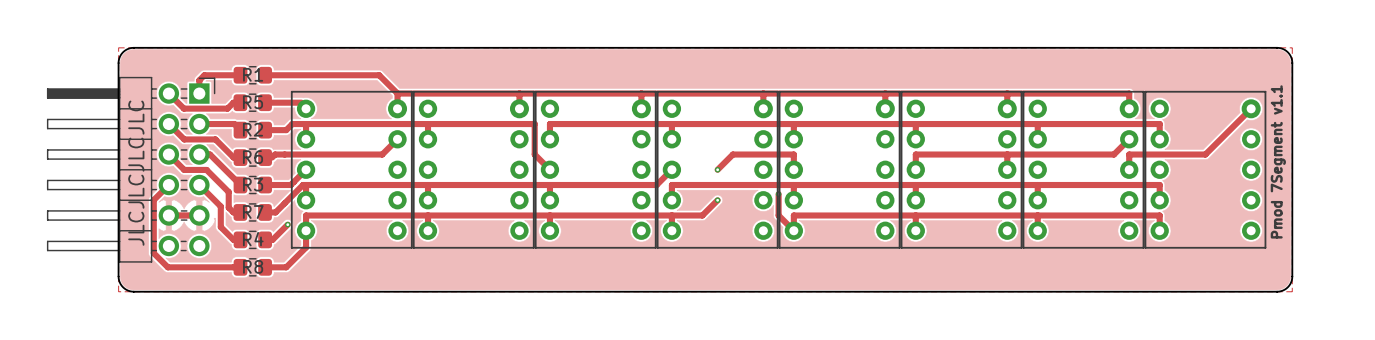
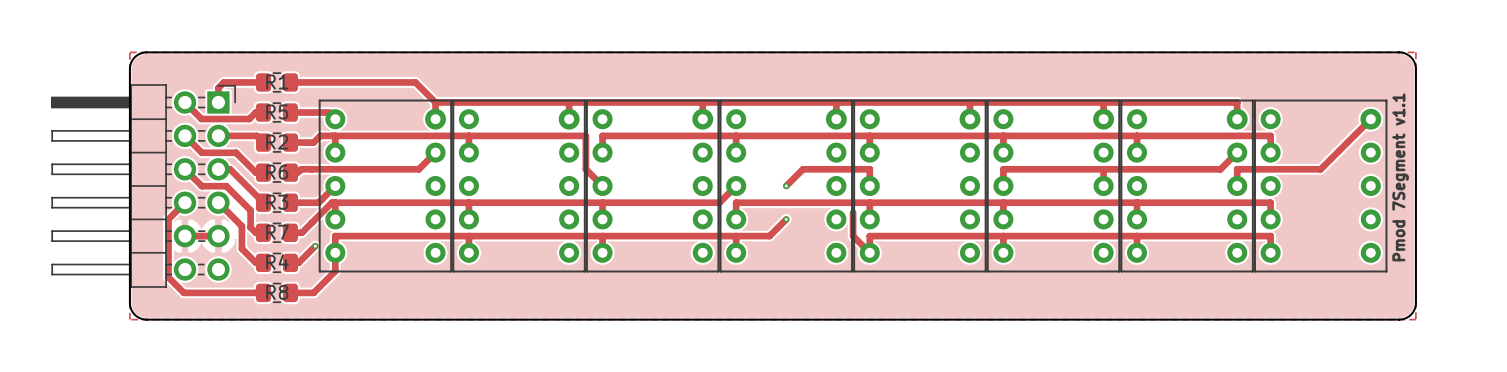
text: JLCJLCJLCJLC (136, 173) -> none

